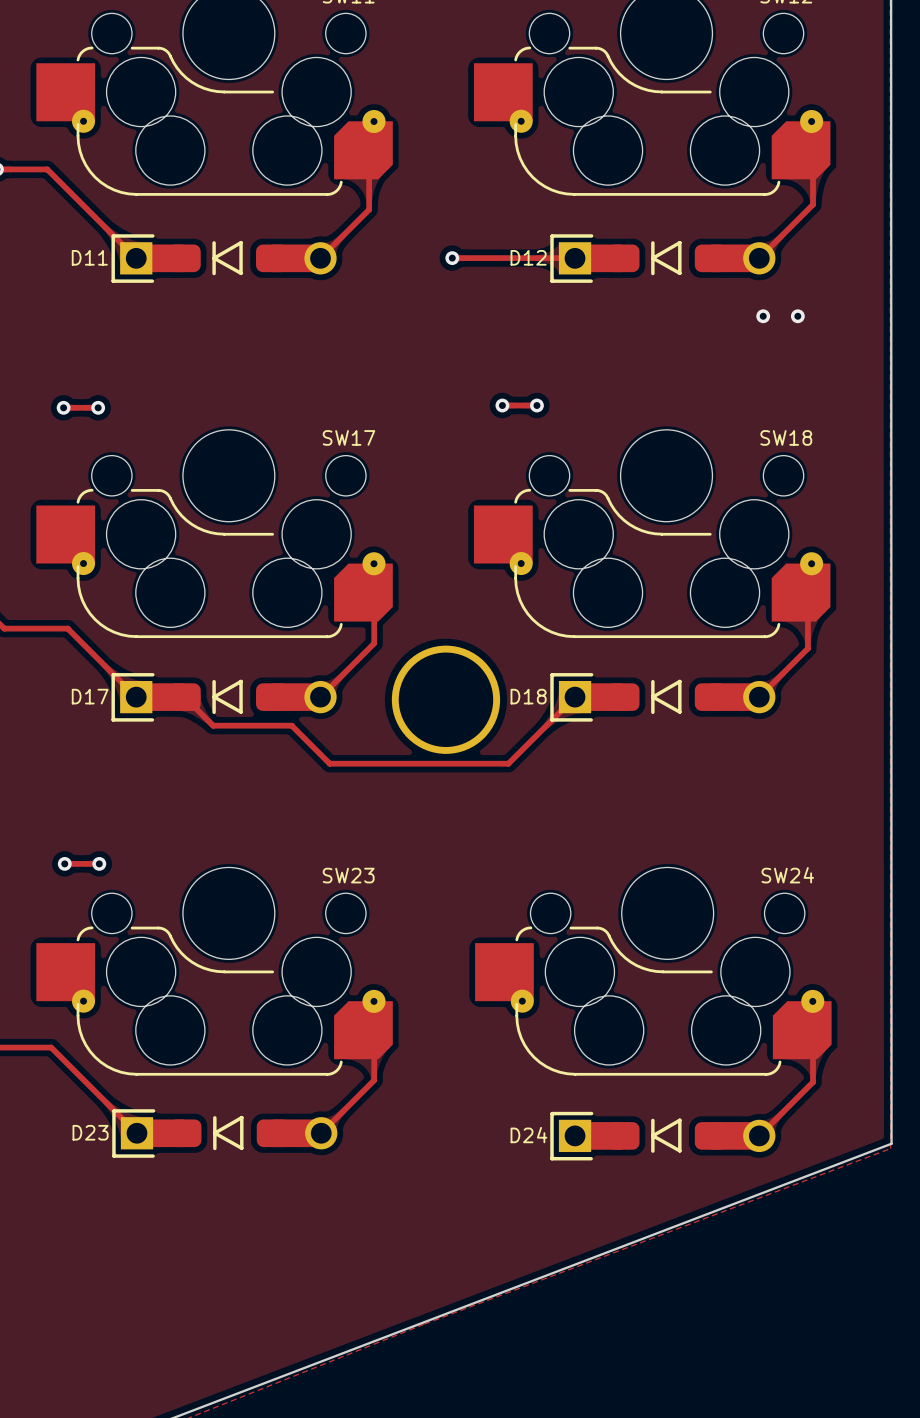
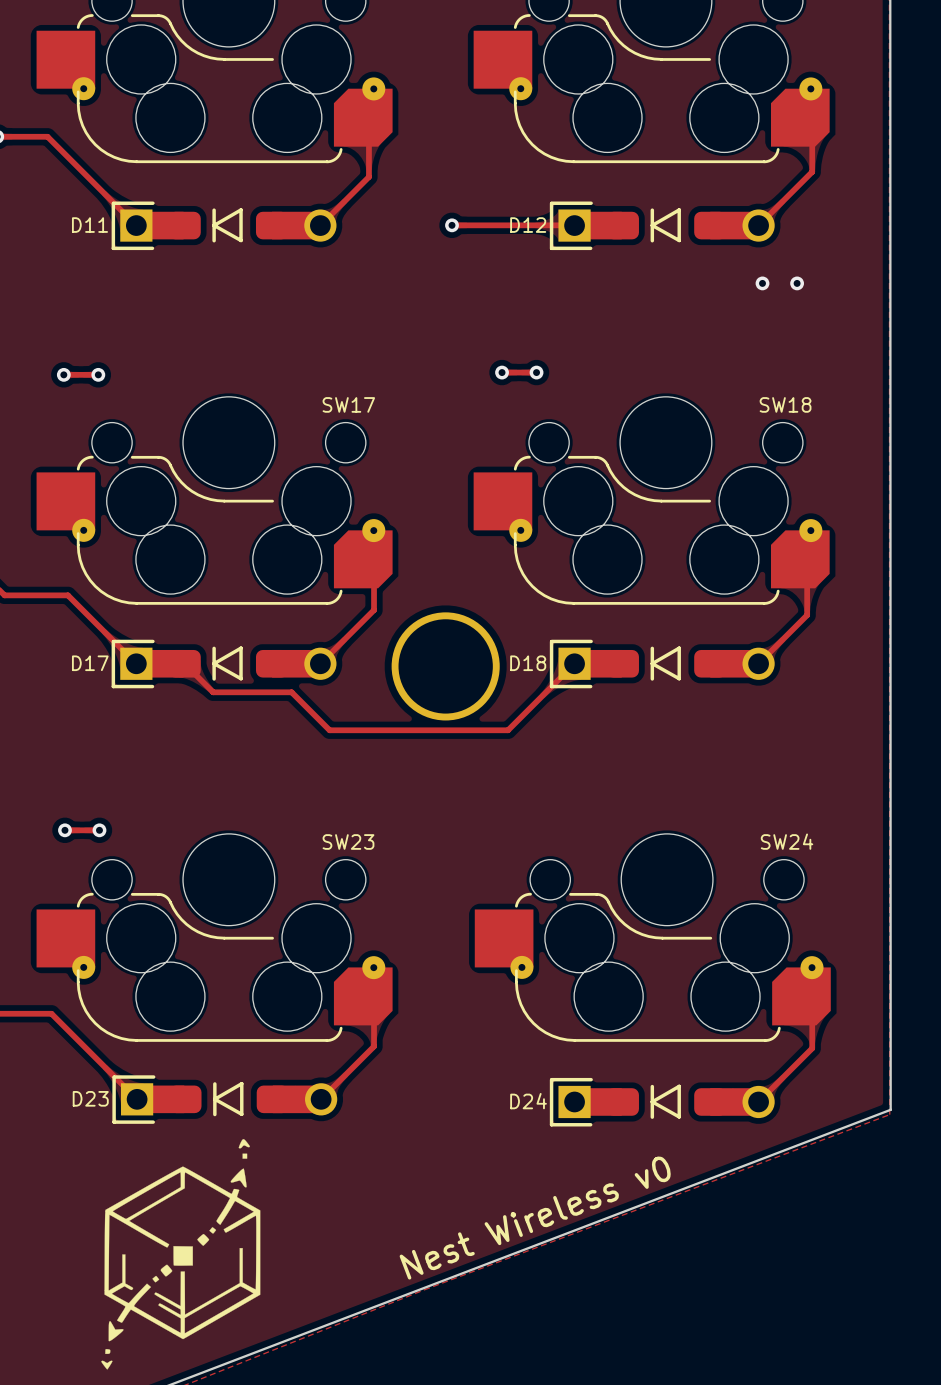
drawing: none -> [101, 1139, 261, 1370]
text: none -> Nest Wireless v0 (535, 1218)

